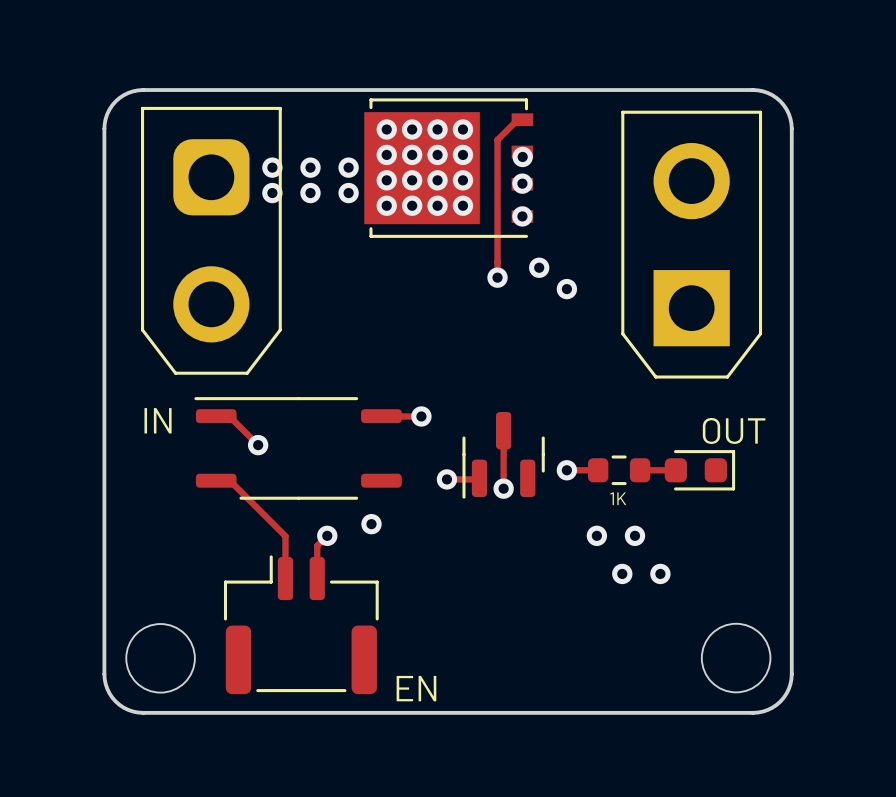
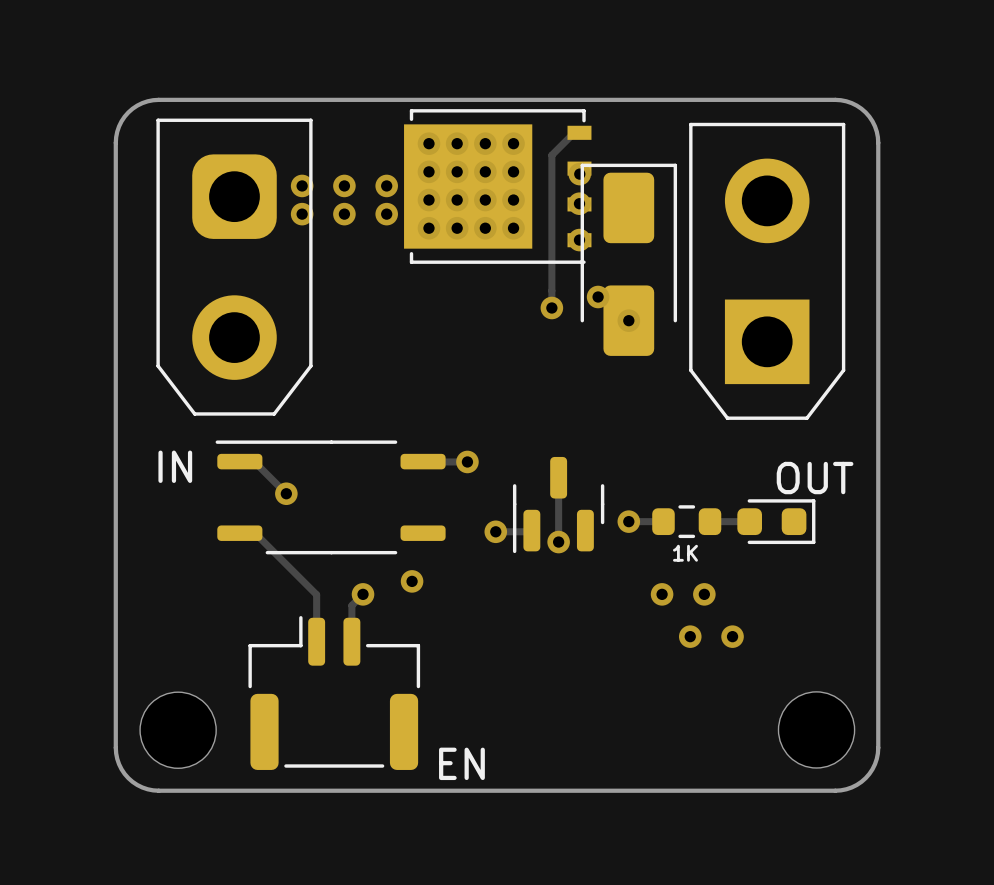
part: none -> (628, 259)

